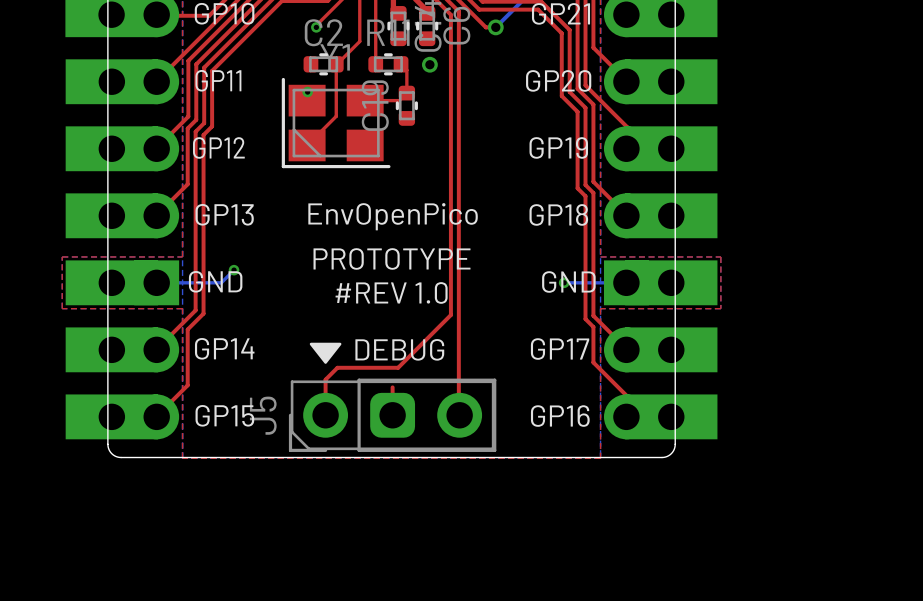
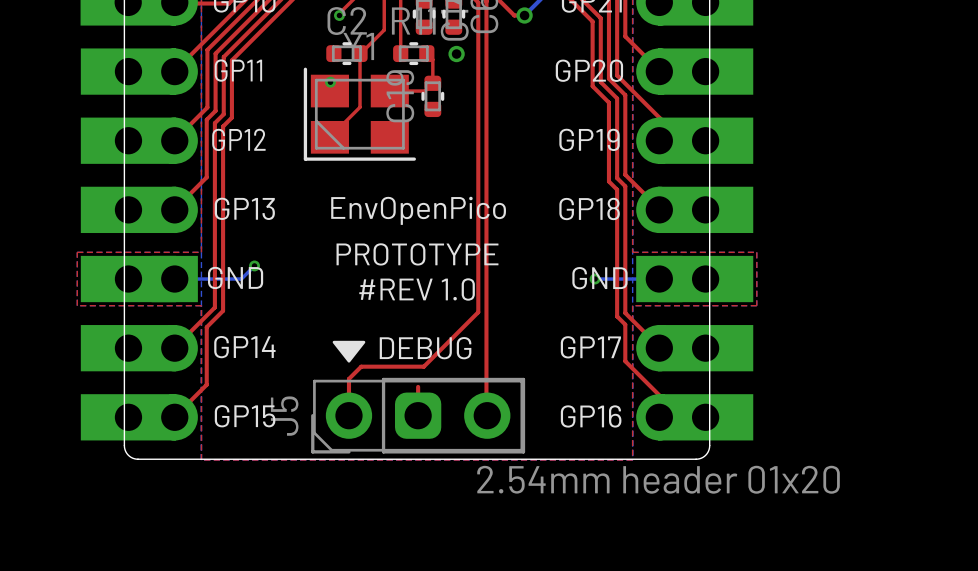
part value: none -> 2.54mm header 01x20 (658, 479)

